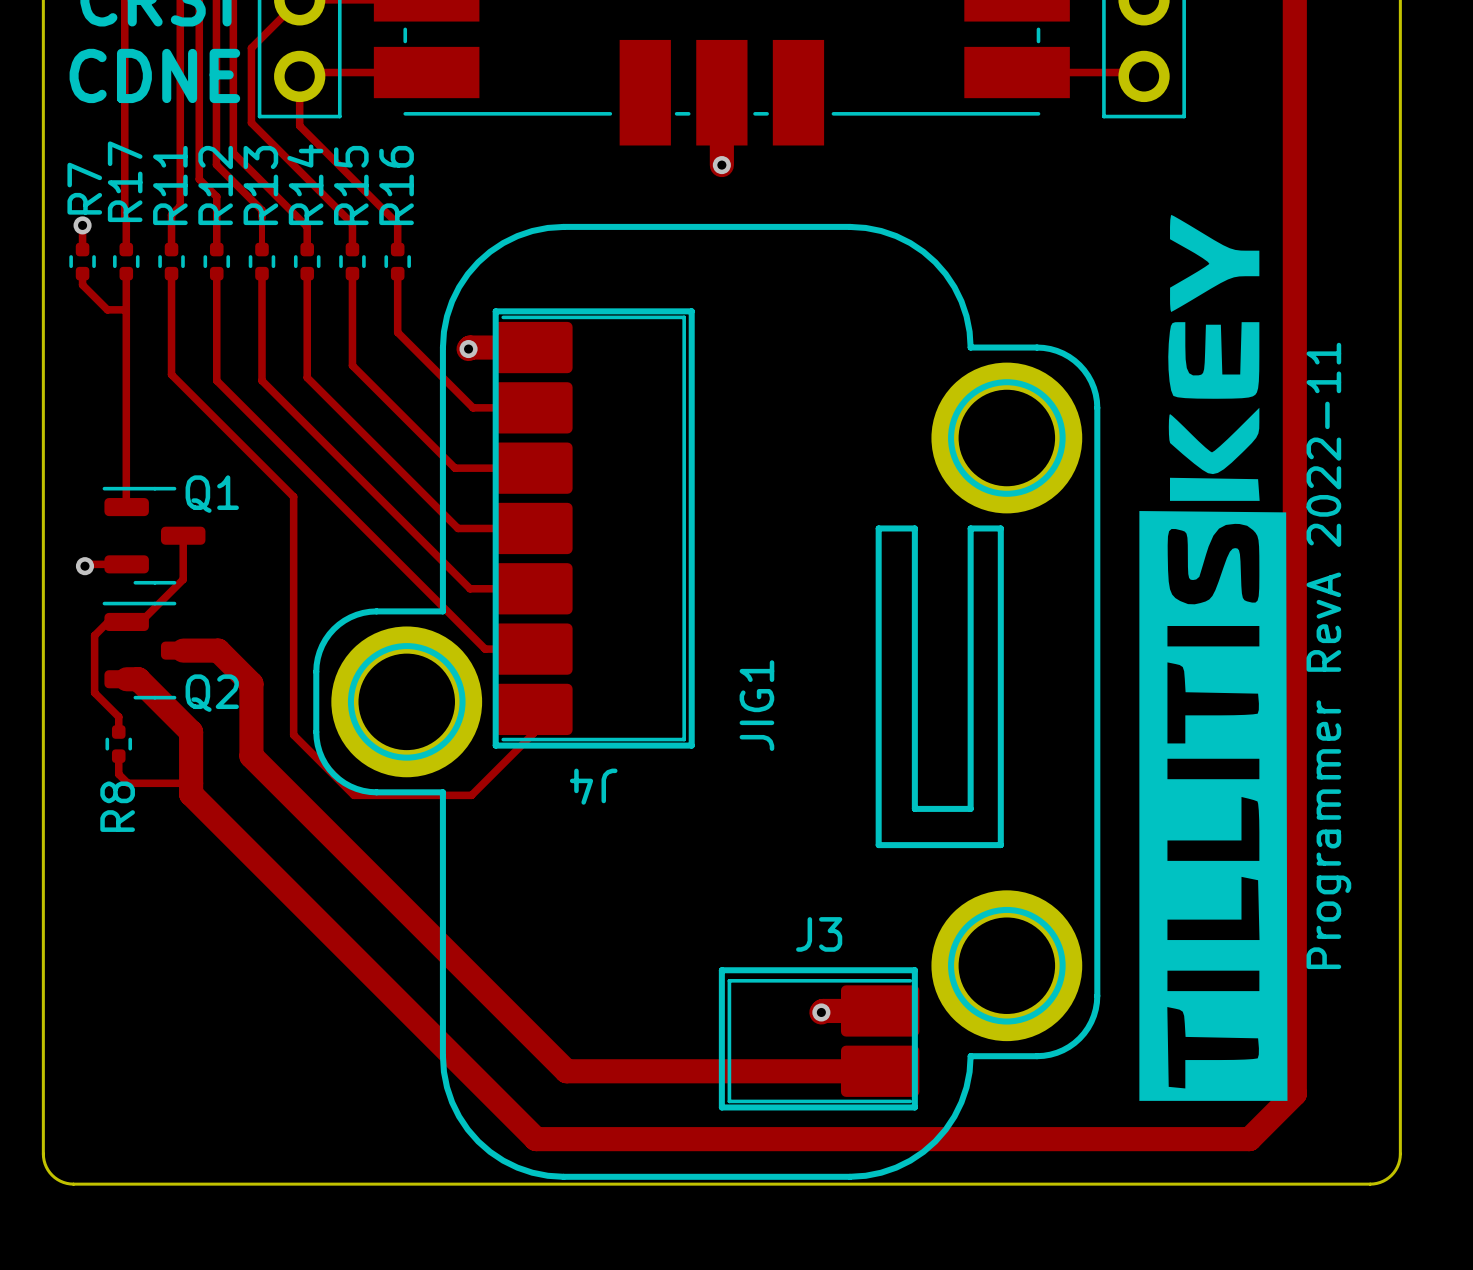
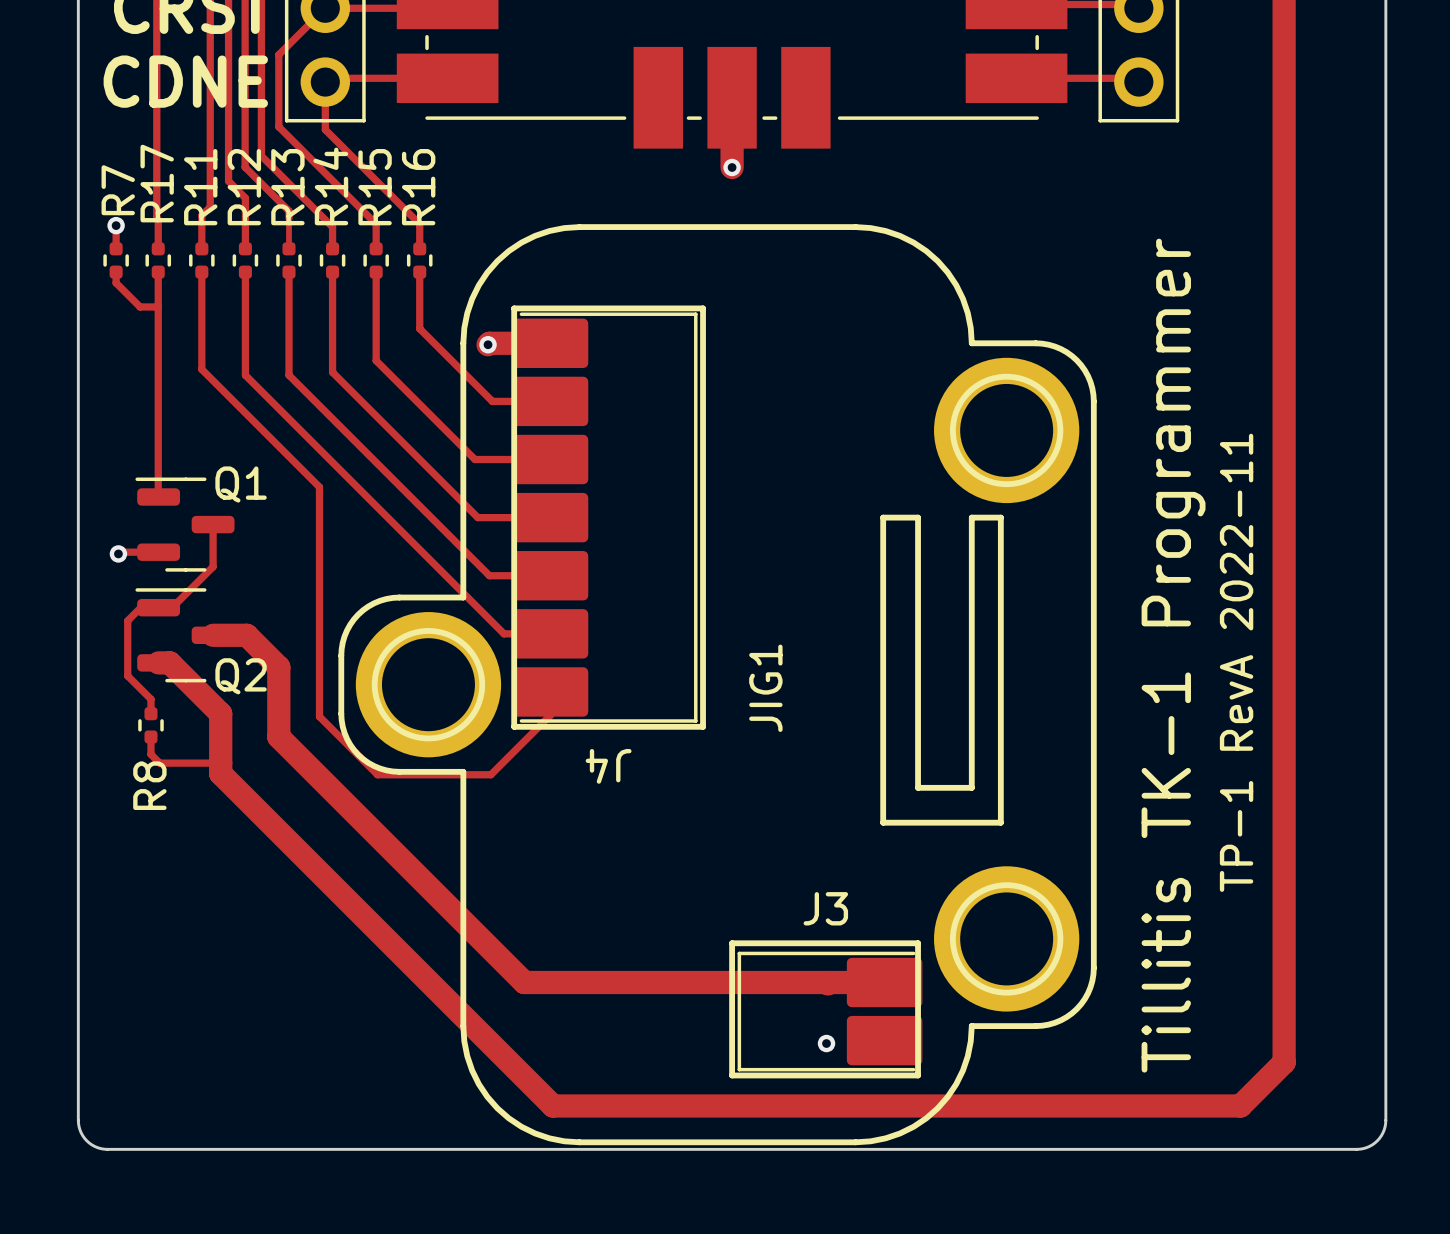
drawing: [1139, 214, 1288, 1101] -> none
text: Programmer RevA 2022-11 (1328, 655) -> none
text: none -> Tillitis TK-1 Programmer (1173, 655)
text: none -> TP-1 RevA 2022-11 (1236, 662)
top track: (506, 1010) (566, 1071) (880, 1071) -> (524, 982) (829, 982)
via position: (821, 1012) -> (826, 1043)

